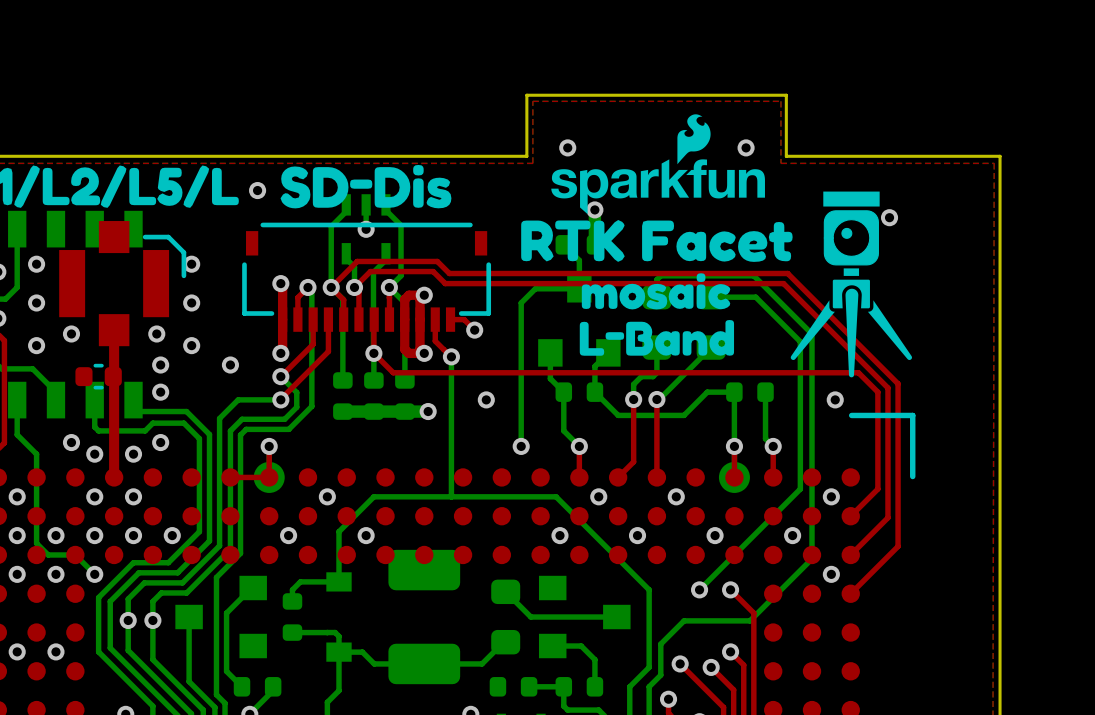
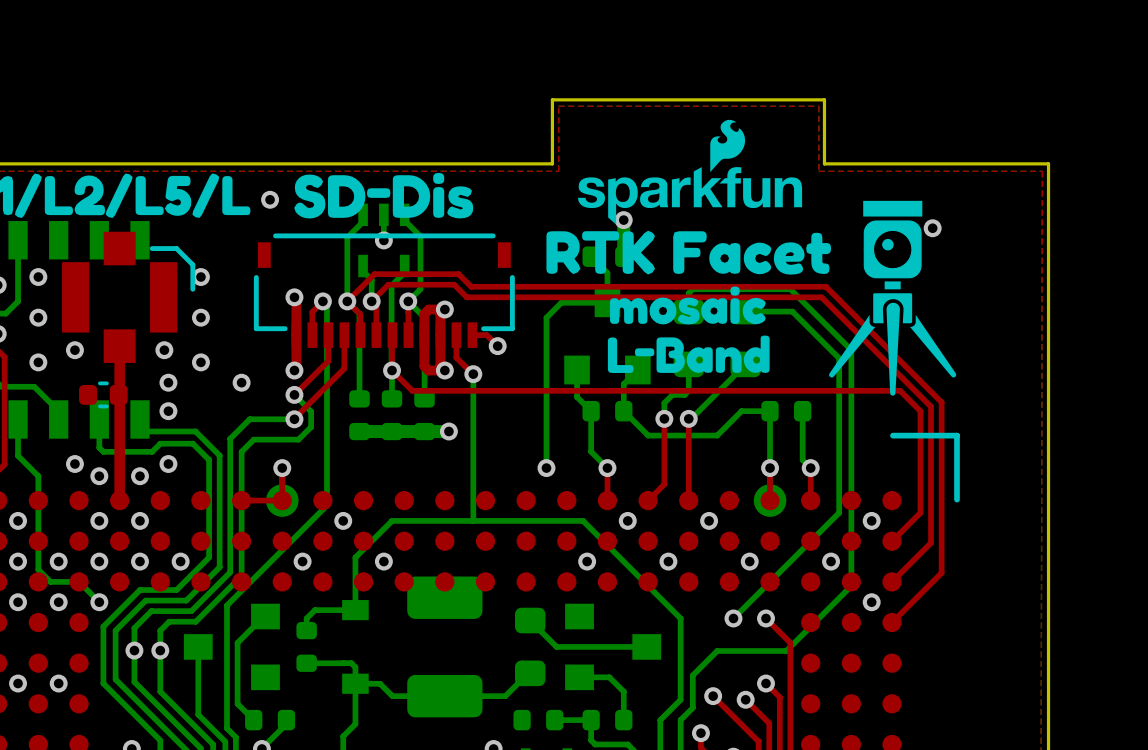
via: (567, 147) -> none
via: (746, 147) -> none
via: (486, 399) -> none
via: (835, 399) -> none
bottom track: (311, 406) (288, 429) (246, 429) (240, 435) (240, 553) -> (326, 426) (326, 505) (252, 580)

